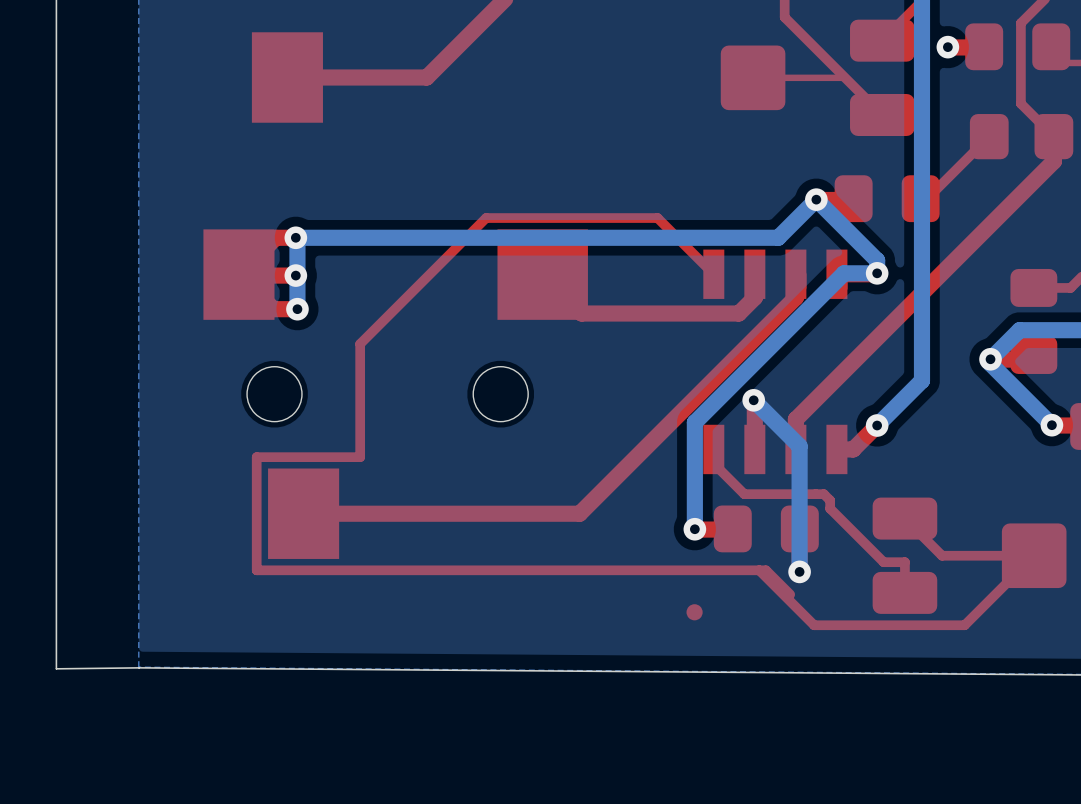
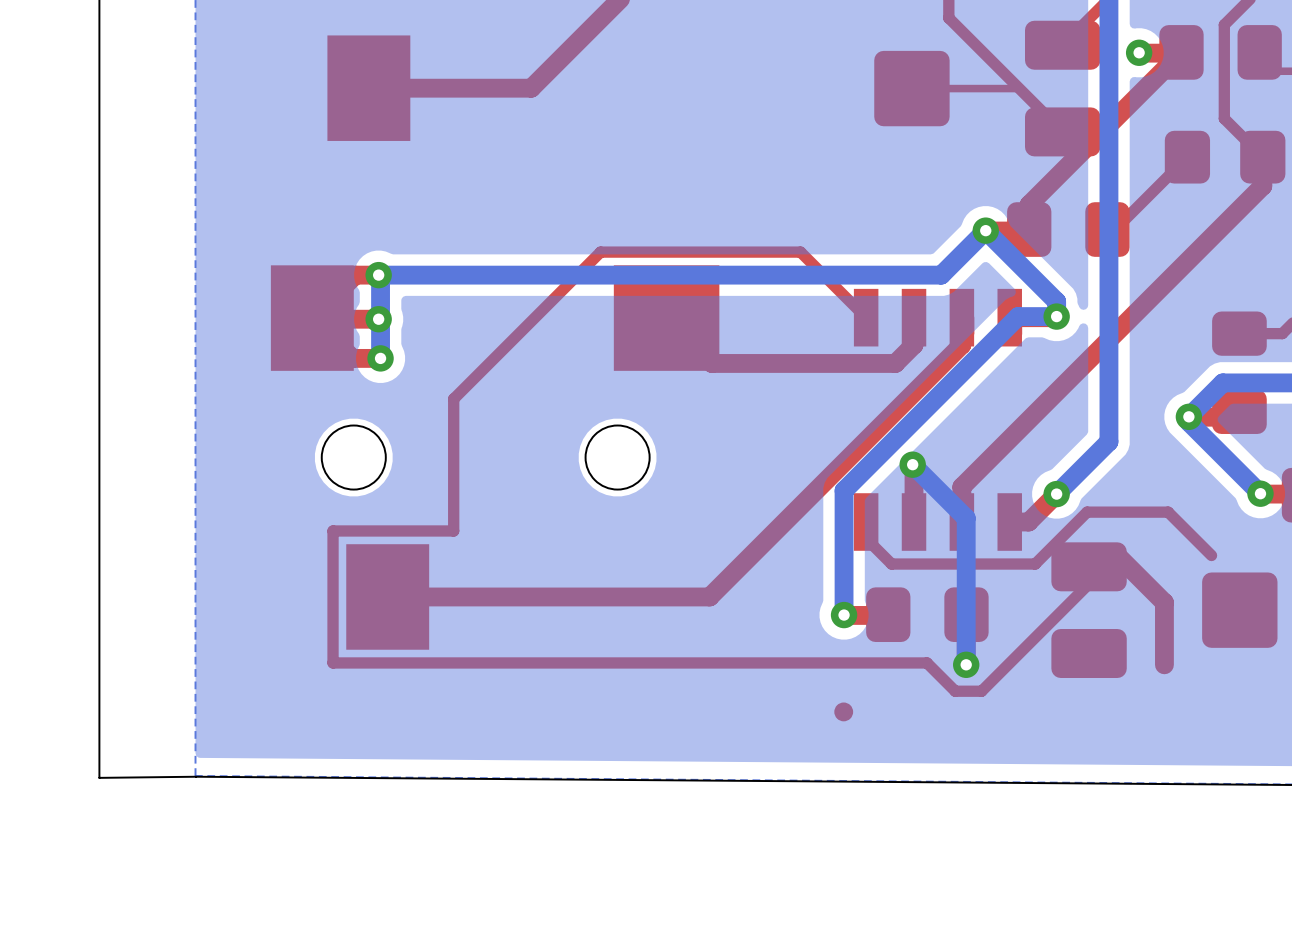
top track: none -> (1181, 52) (1029, 204) (1029, 229)
top track: (735, 485) (744, 494) (823, 494) (830, 500) (830, 508) (883, 562) (904, 562) (904, 592) -> (891, 564) (1035, 564) (1087, 512) (1168, 512) (1211, 555)
top track: (904, 518) (942, 555) (1034, 555) (964, 625) (814, 625) (759, 570) -> none
part position: (969, 555) -> (1164, 610)
top track: none -> (1164, 664) (1164, 602) (1117, 555) (981, 691) (955, 691)

